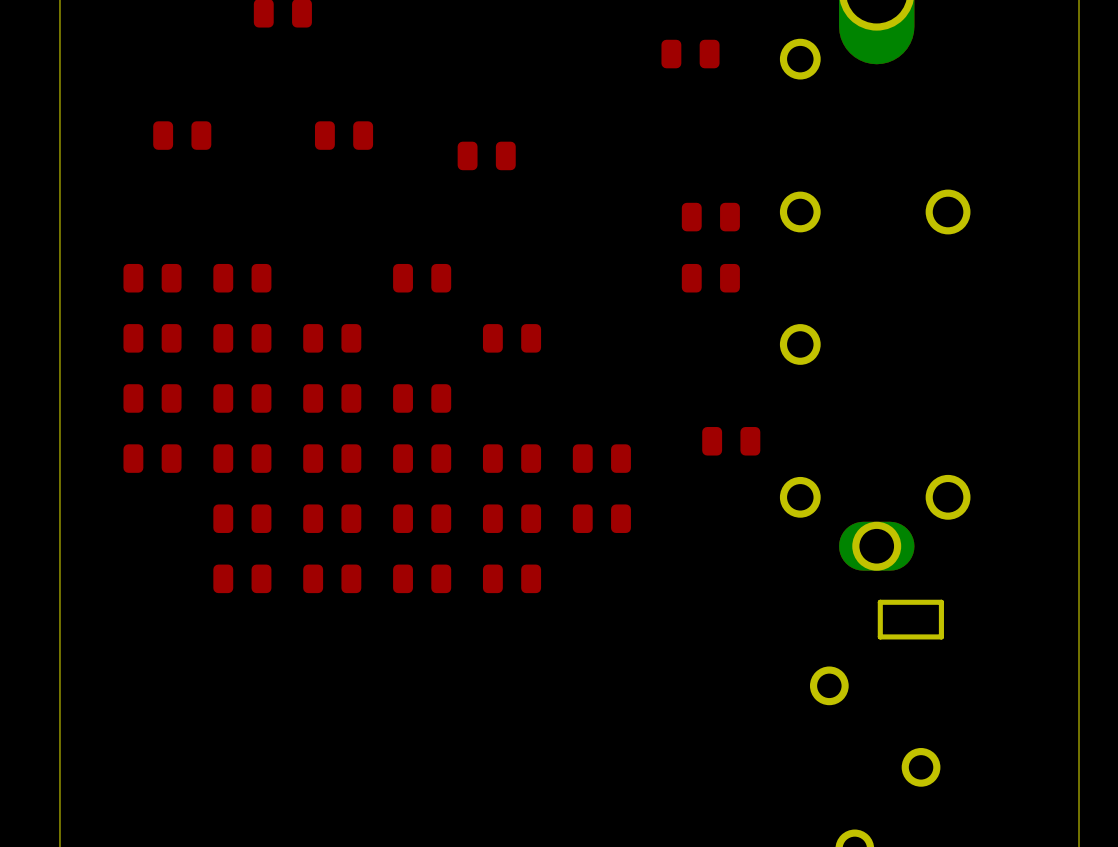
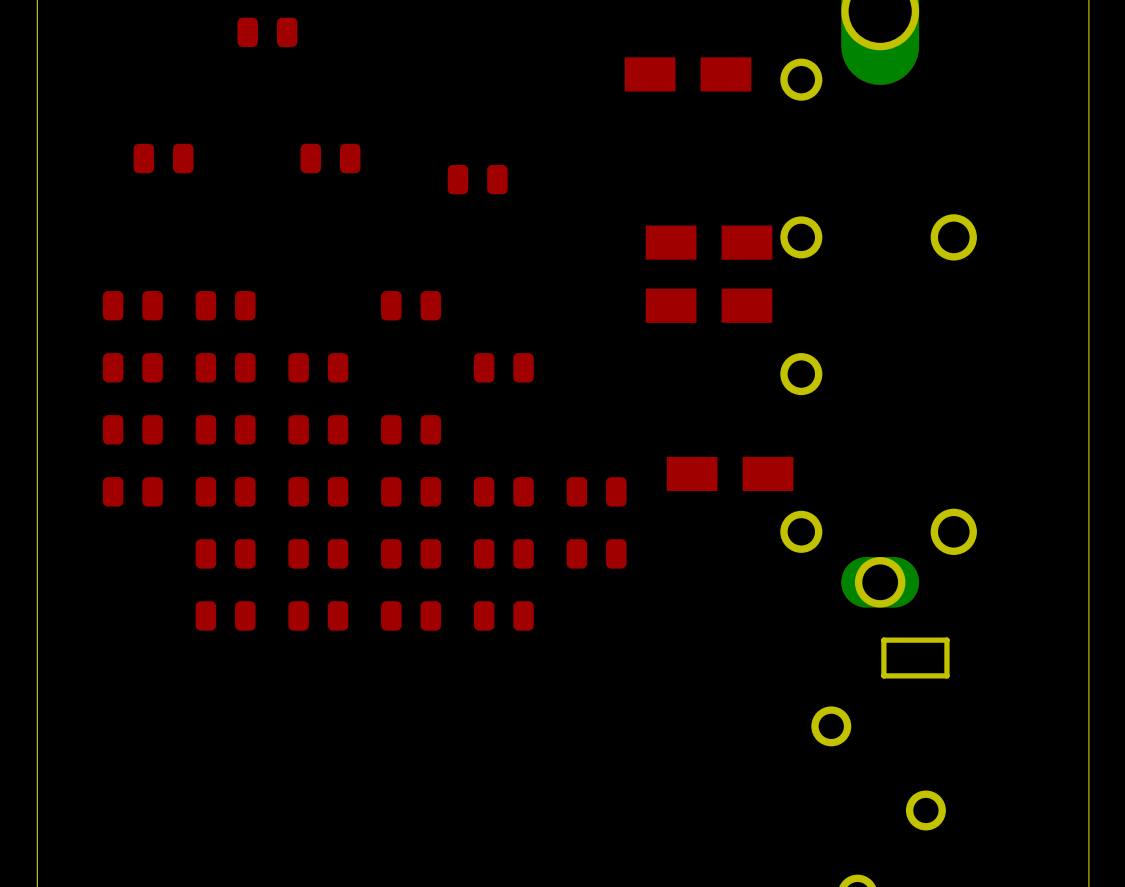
part footprint: [661, 39, 720, 69] -> [624, 57, 752, 92]
part footprint: [681, 202, 740, 232] -> [645, 225, 773, 260]
part footprint: [681, 263, 740, 293] -> [645, 288, 773, 323]
part footprint: [702, 427, 761, 456] -> [666, 456, 794, 492]

